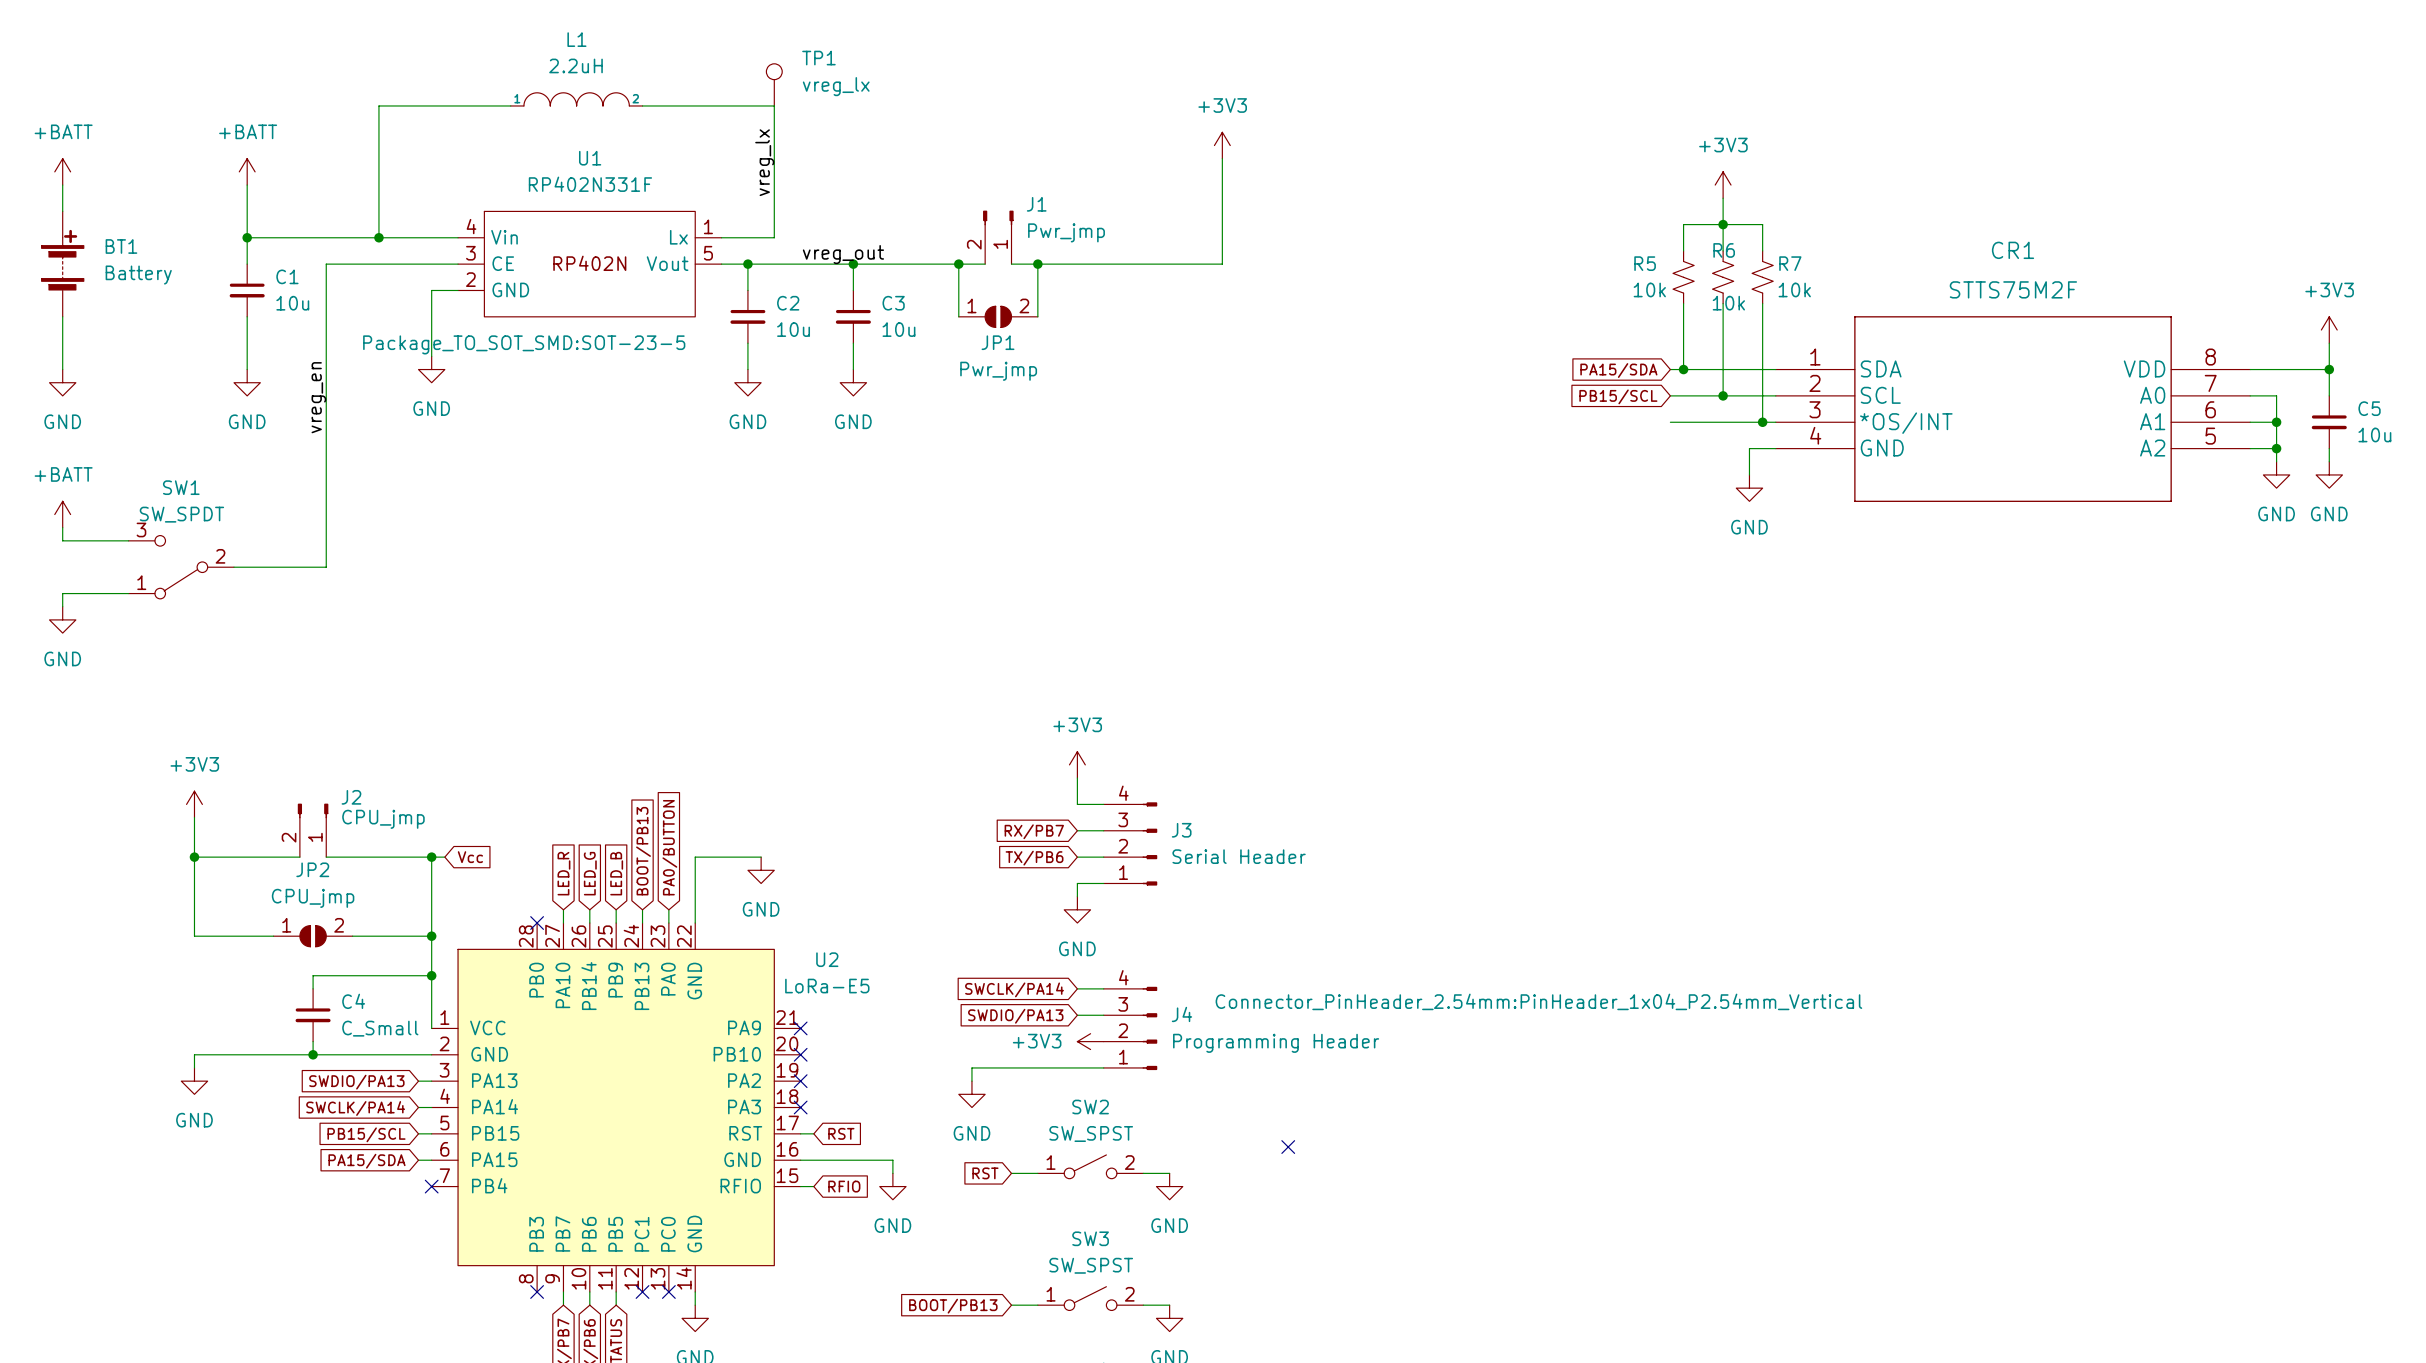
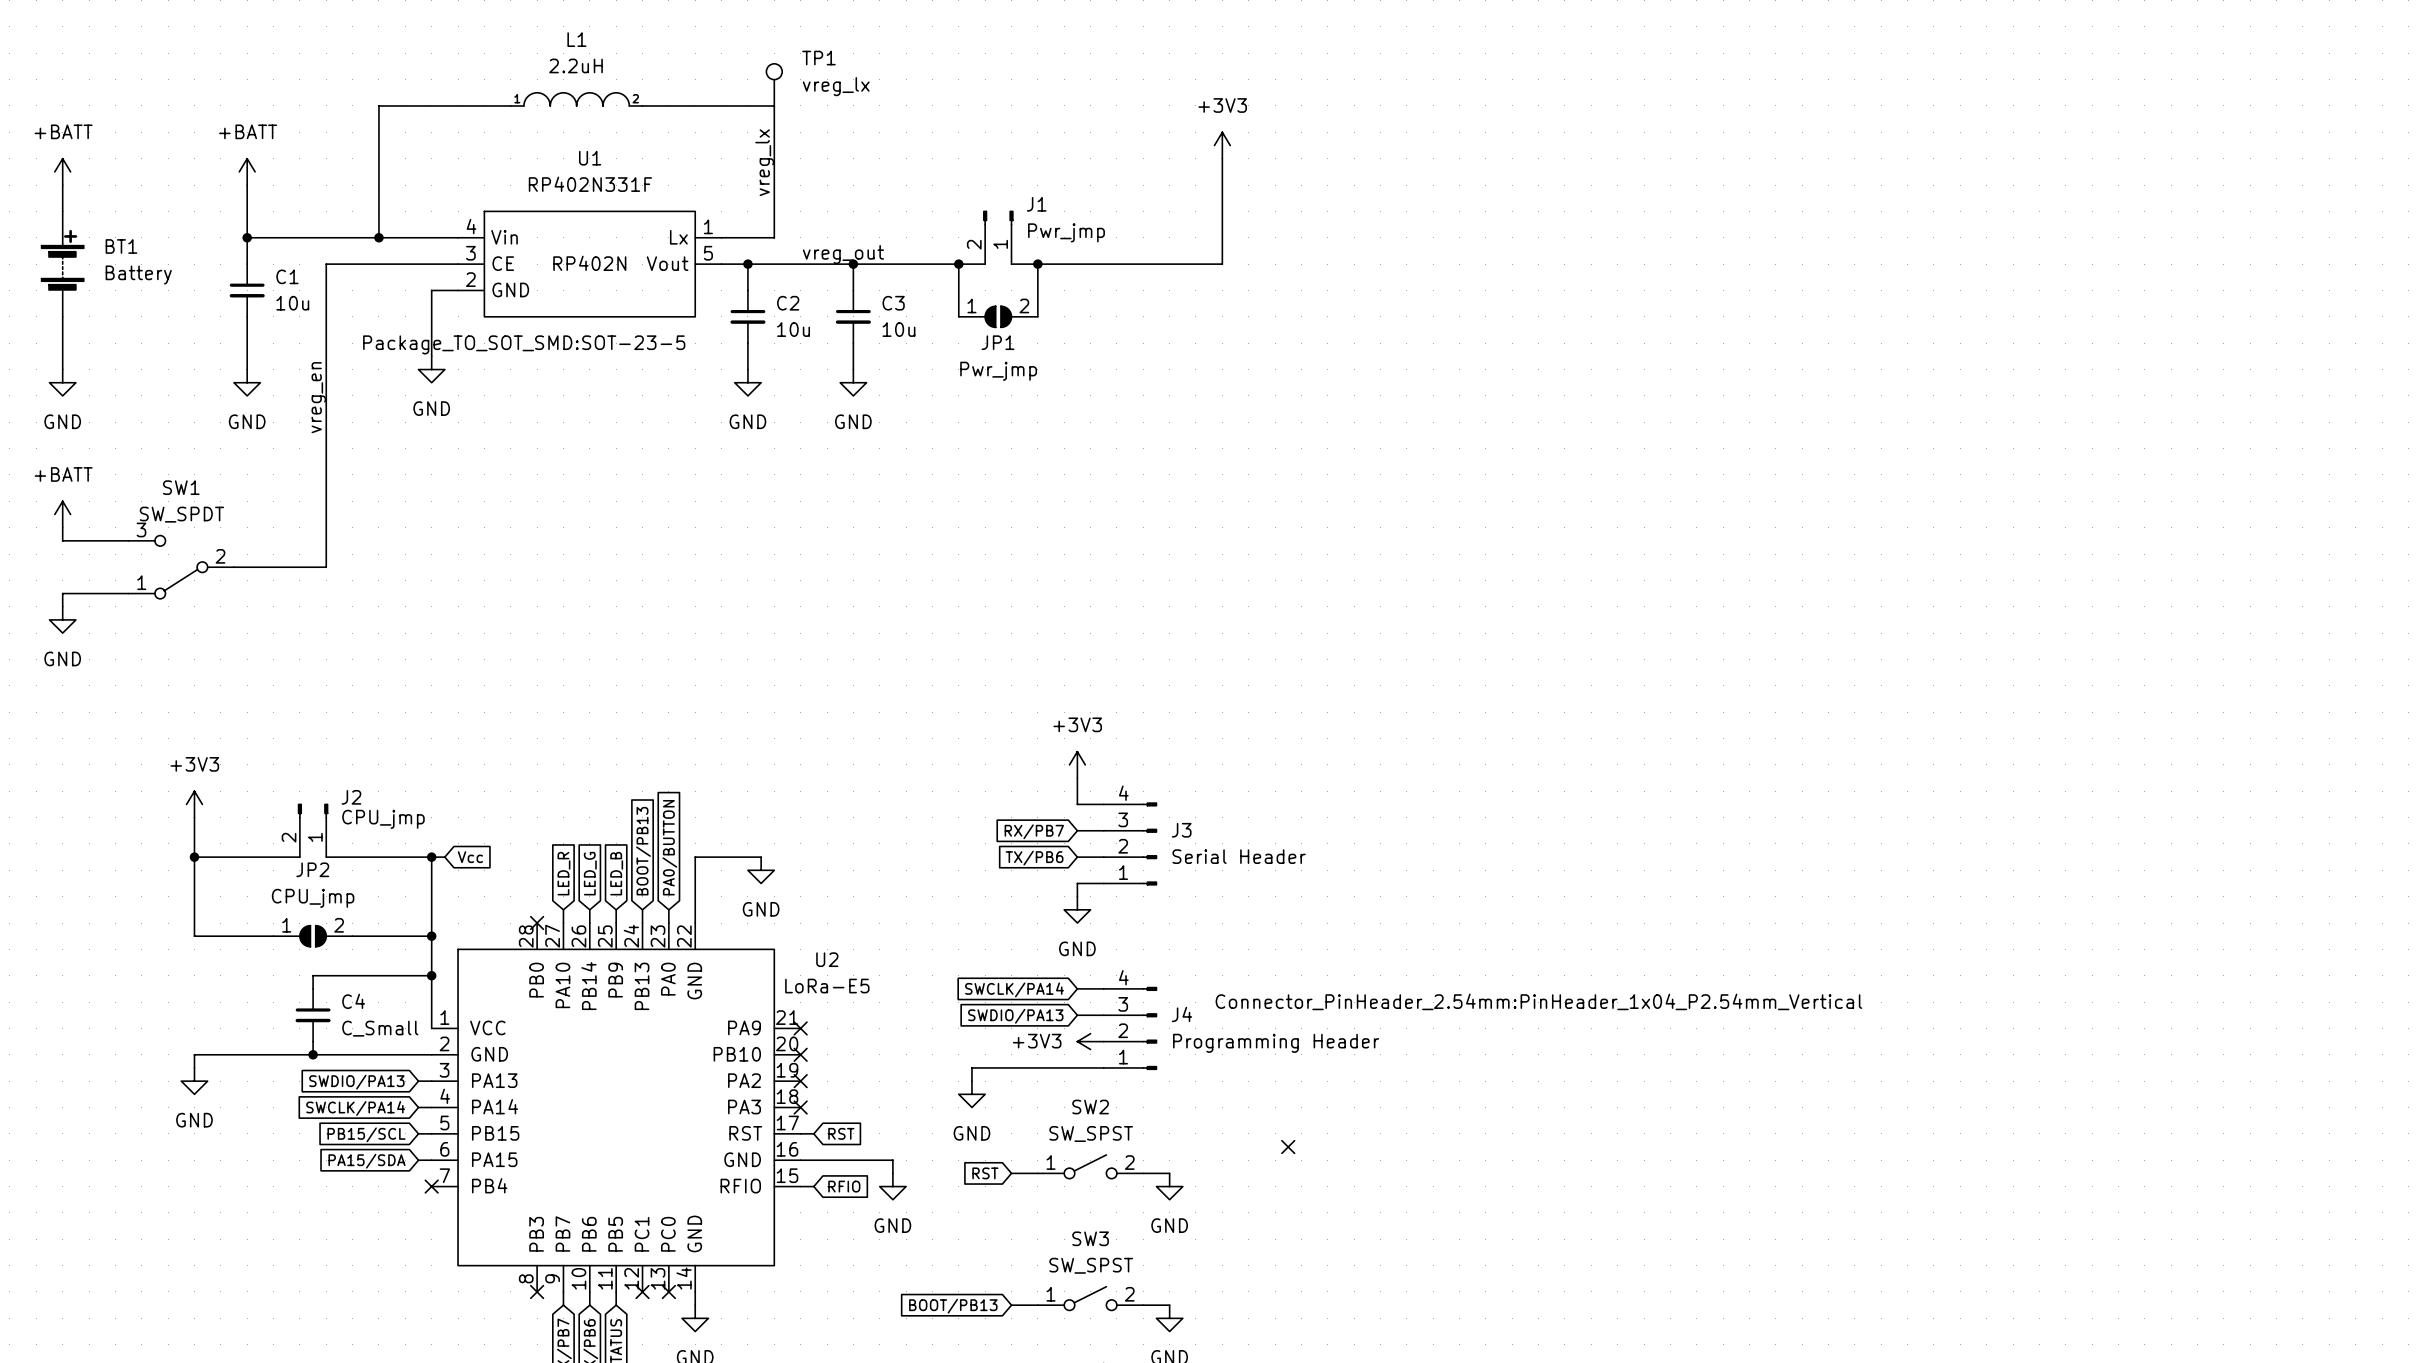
power symbol: +3V3 (1723, 185) -> none
wire: (1723, 198) (1723, 250) -> none
junction: (1723, 224) -> none
wire: (1683, 250) (1683, 224) (1762, 224) (1762, 250) -> none
R5: 10k (1683, 277) -> none
R6: 10k (1723, 277) -> none
R7: 10k (1762, 277) -> none
wire: (1683, 303) (1683, 369) -> none
wire: (1723, 303) (1723, 395) -> none
wire: (1762, 303) (1762, 422) -> none
power symbol: +3V3 (2329, 330) -> none
wire: (2329, 343) (2329, 395) -> none
wire: (1670, 369) (1775, 369) -> none
junction: (1683, 369) -> none
wire: (2250, 369) (2329, 369) -> none
junction: (2329, 369) -> none
global label: PA15/SDA (1618, 370) -> none
wire: (1670, 395) (1775, 395) -> none
junction: (1723, 395) -> none
wire: (2250, 395) (2276, 395) (2276, 461) -> none
global label: PB15/SCL (1618, 396) -> none
CR1: STTS75M2F (2013, 409) -> none
wire: (1670, 422) (1775, 422) -> none
junction: (1762, 422) -> none
wire: (2250, 422) (2276, 422) -> none
junction: (2276, 422) -> none
C5: 10u (2329, 422) -> none
wire: (1775, 448) (1749, 448) (1749, 474) -> none
wire: (2250, 448) (2276, 448) -> none
junction: (2276, 448) -> none
wire: (2329, 448) (2329, 461) -> none
power symbol: GND (2276, 474) -> none
power symbol: GND (2329, 474) -> none
power symbol: GND (1749, 488) -> none

